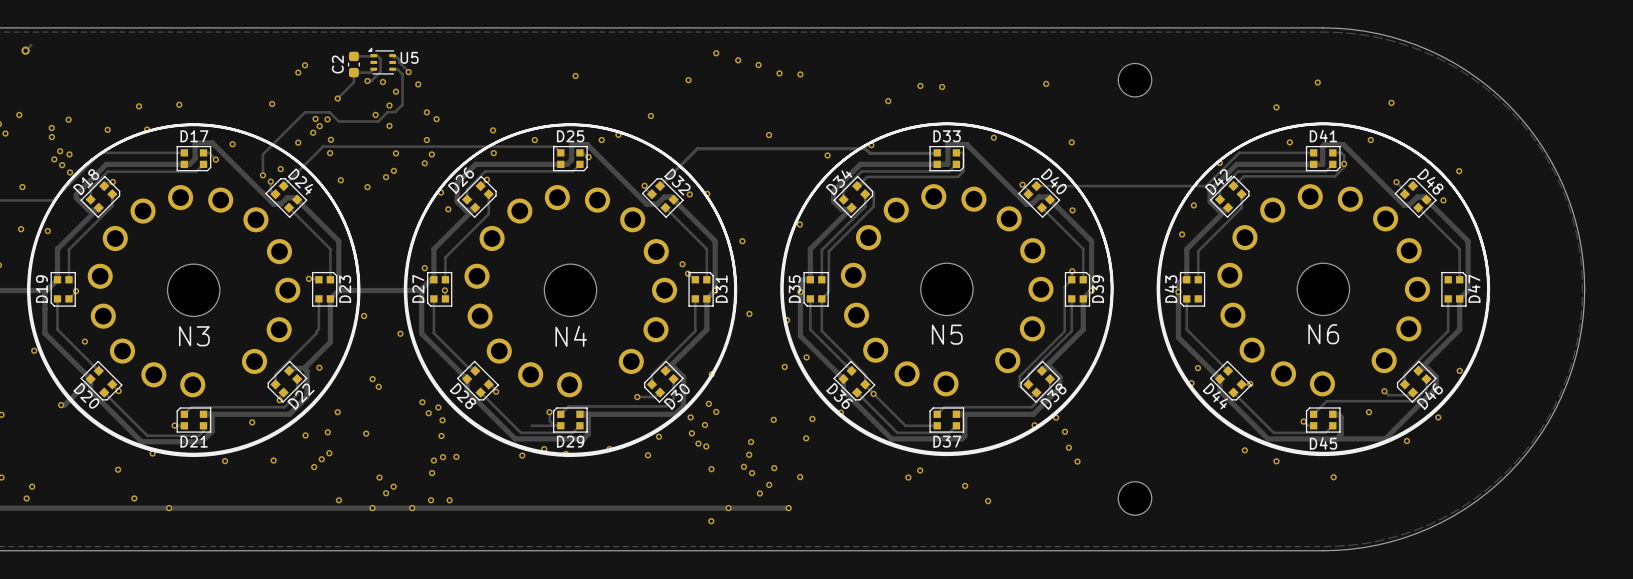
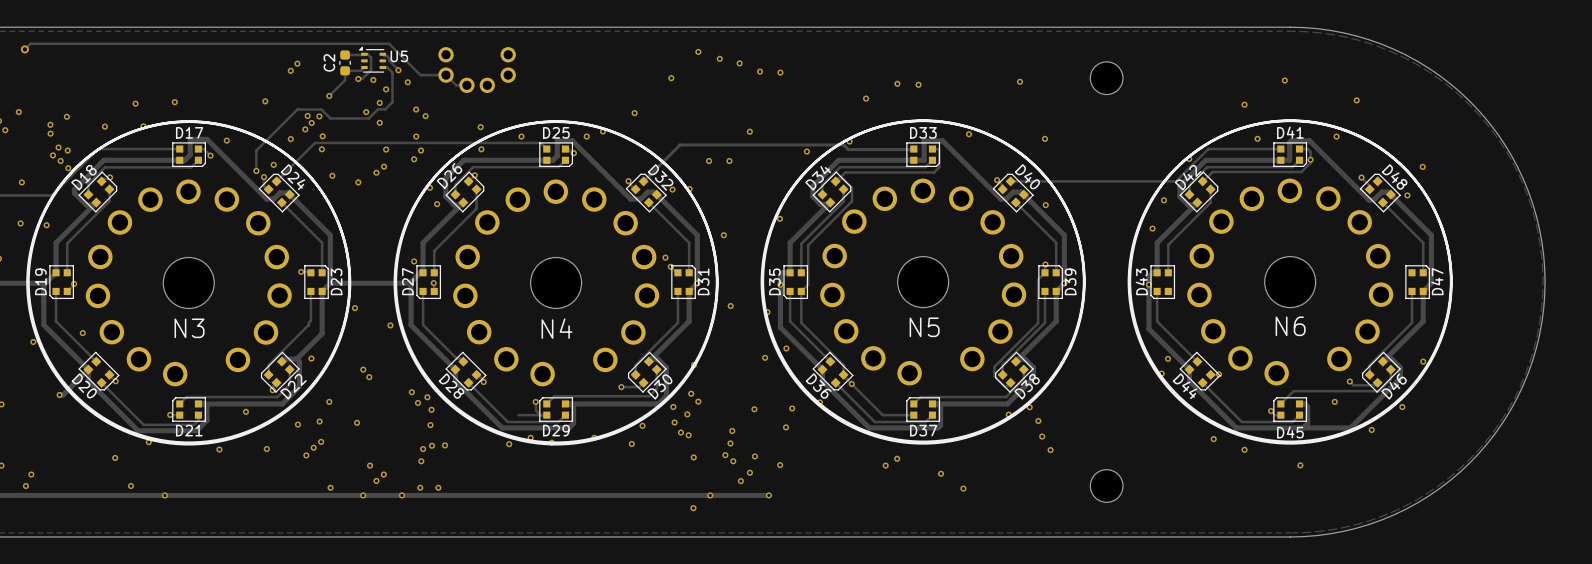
track: none -> (30, 43) (389, 43) (420, 75) (446, 75) (456, 85) (466, 85)
part: none -> (477, 70)
via: (575, 76) -> none
via: none -> (709, 161)
via: none -> (729, 161)
N5 rotation: 0° (946, 289) -> 7.9° clockwise (923, 281)
N6 rotation: 0° (1323, 289) -> 7.9° clockwise (1290, 281)
N3 rotation: 0° (193, 290) -> 7.9° clockwise (188, 282)
N4 rotation: 0° (570, 290) -> 7.9° clockwise (556, 282)

